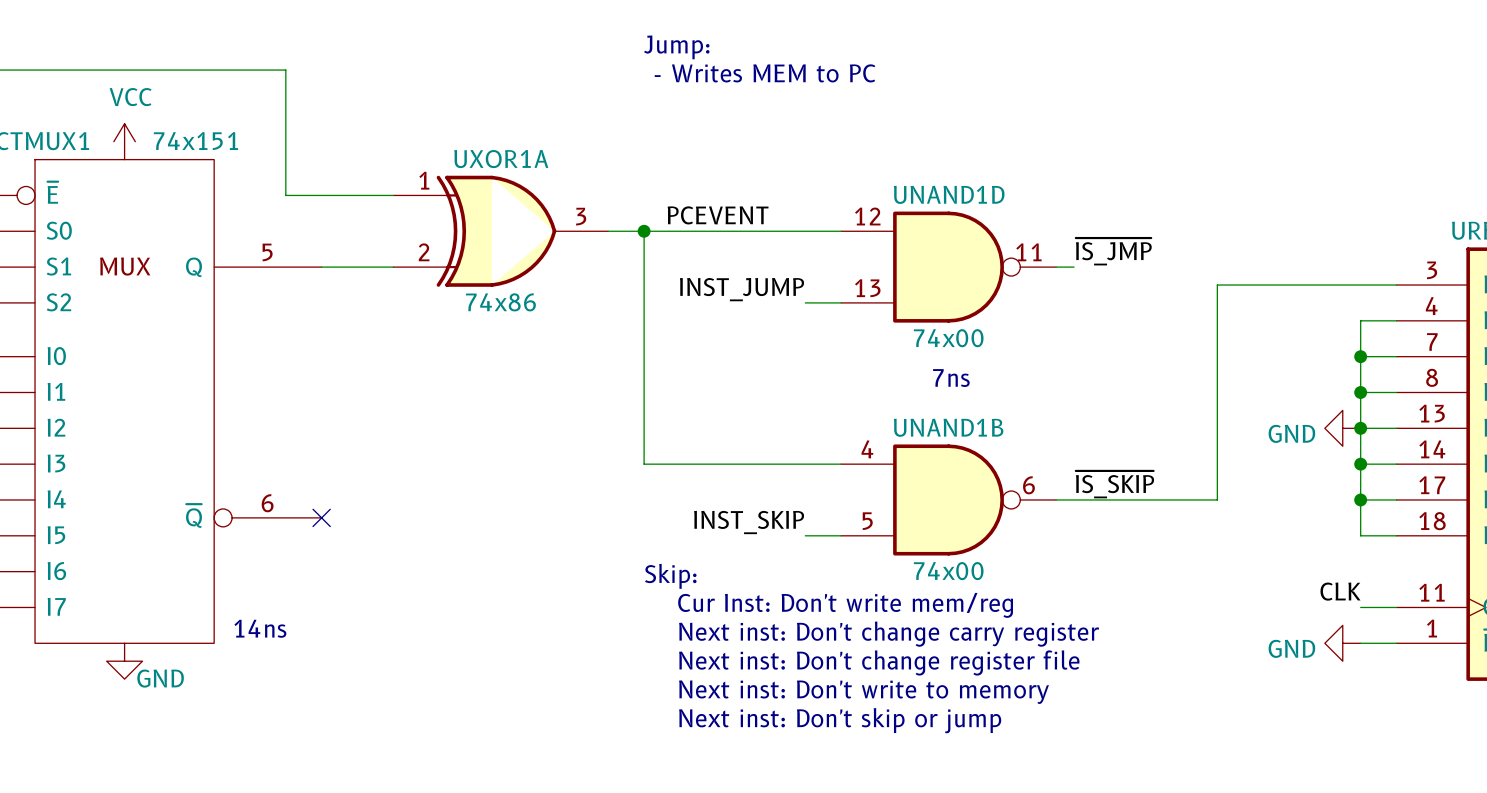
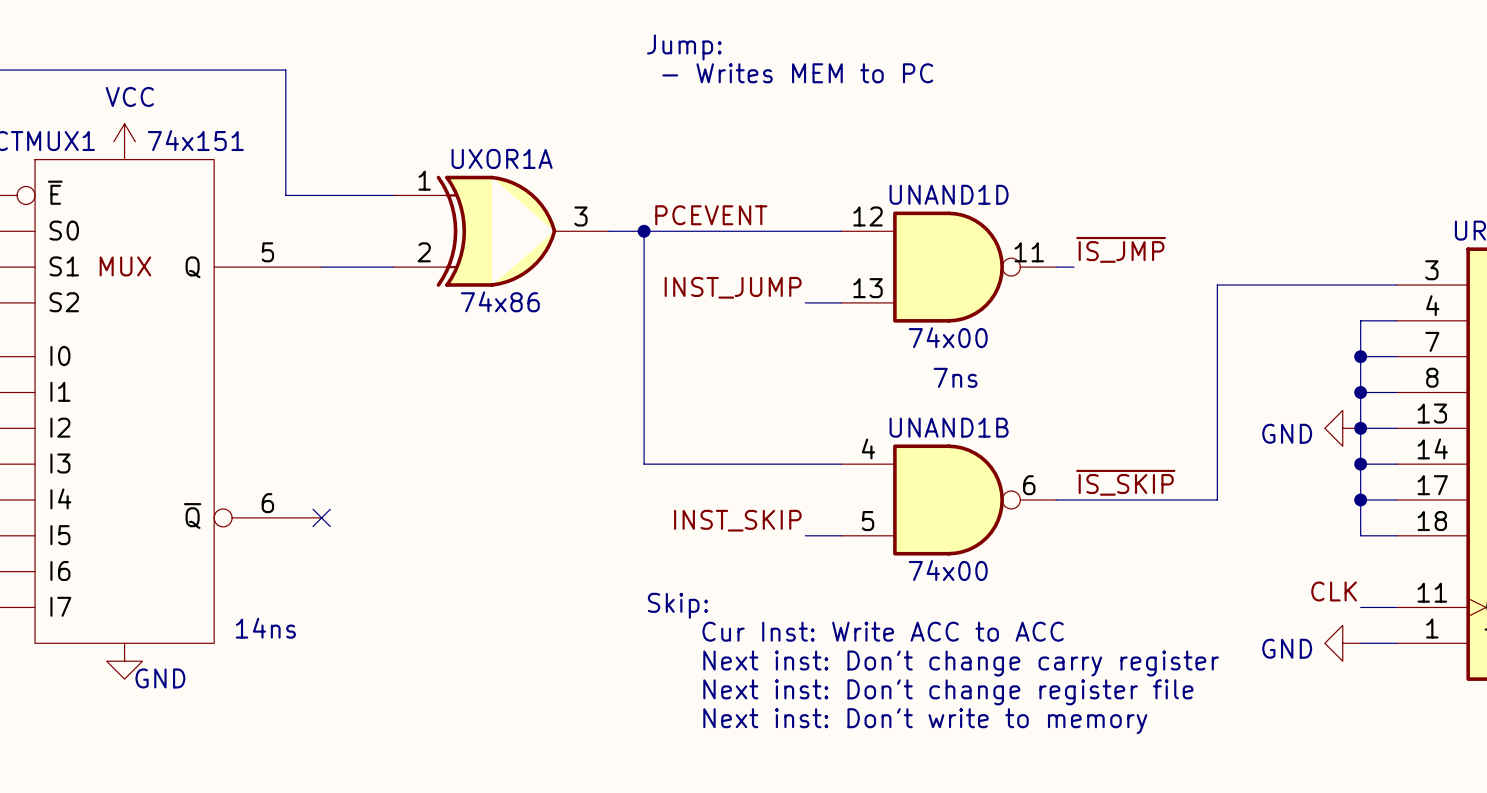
text: Skip: (670, 576) -> none
text: Cur Inst: Don't write mem/reg (845, 605) -> Skip: (677, 605)
text: Next inst: Don't change carry register (889, 634) -> Cur Inst: Write ACC to ACC (883, 631)
text: Next inst: Don't change register file (879, 662) -> Next inst: Don't change carry register (961, 663)
text: Next inst: Don't write to memory (864, 692) -> Next inst: Don't change register file (948, 692)
text: Next inst: Don't skip or jump (840, 720) -> Next inst: Don't write to memory (925, 721)

